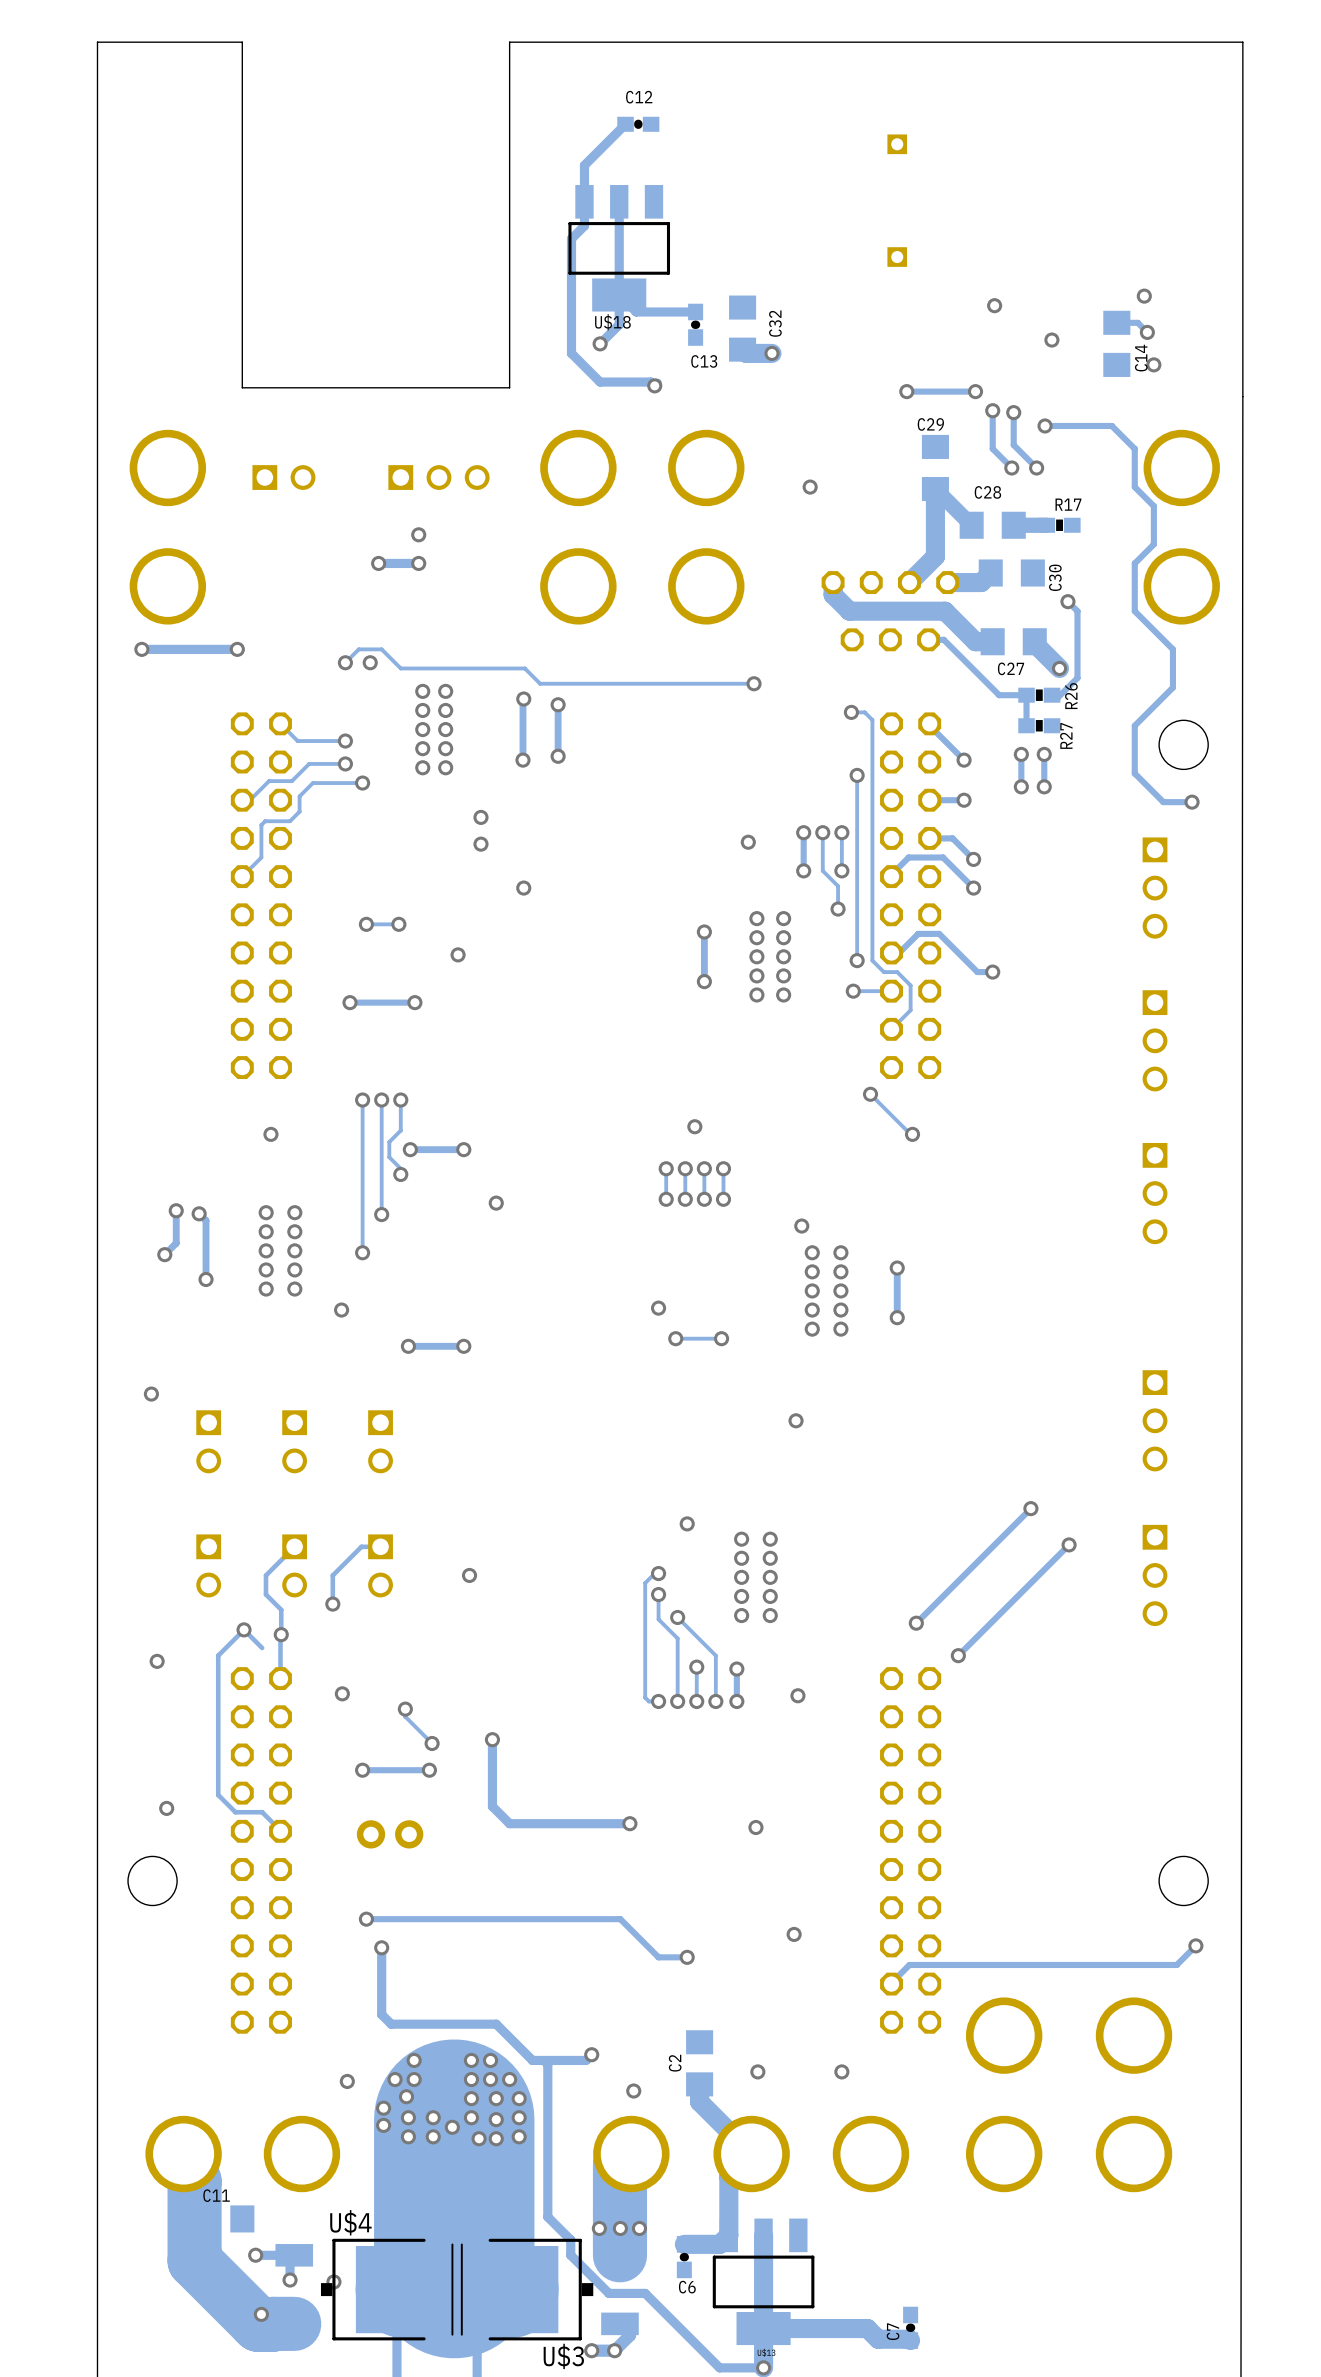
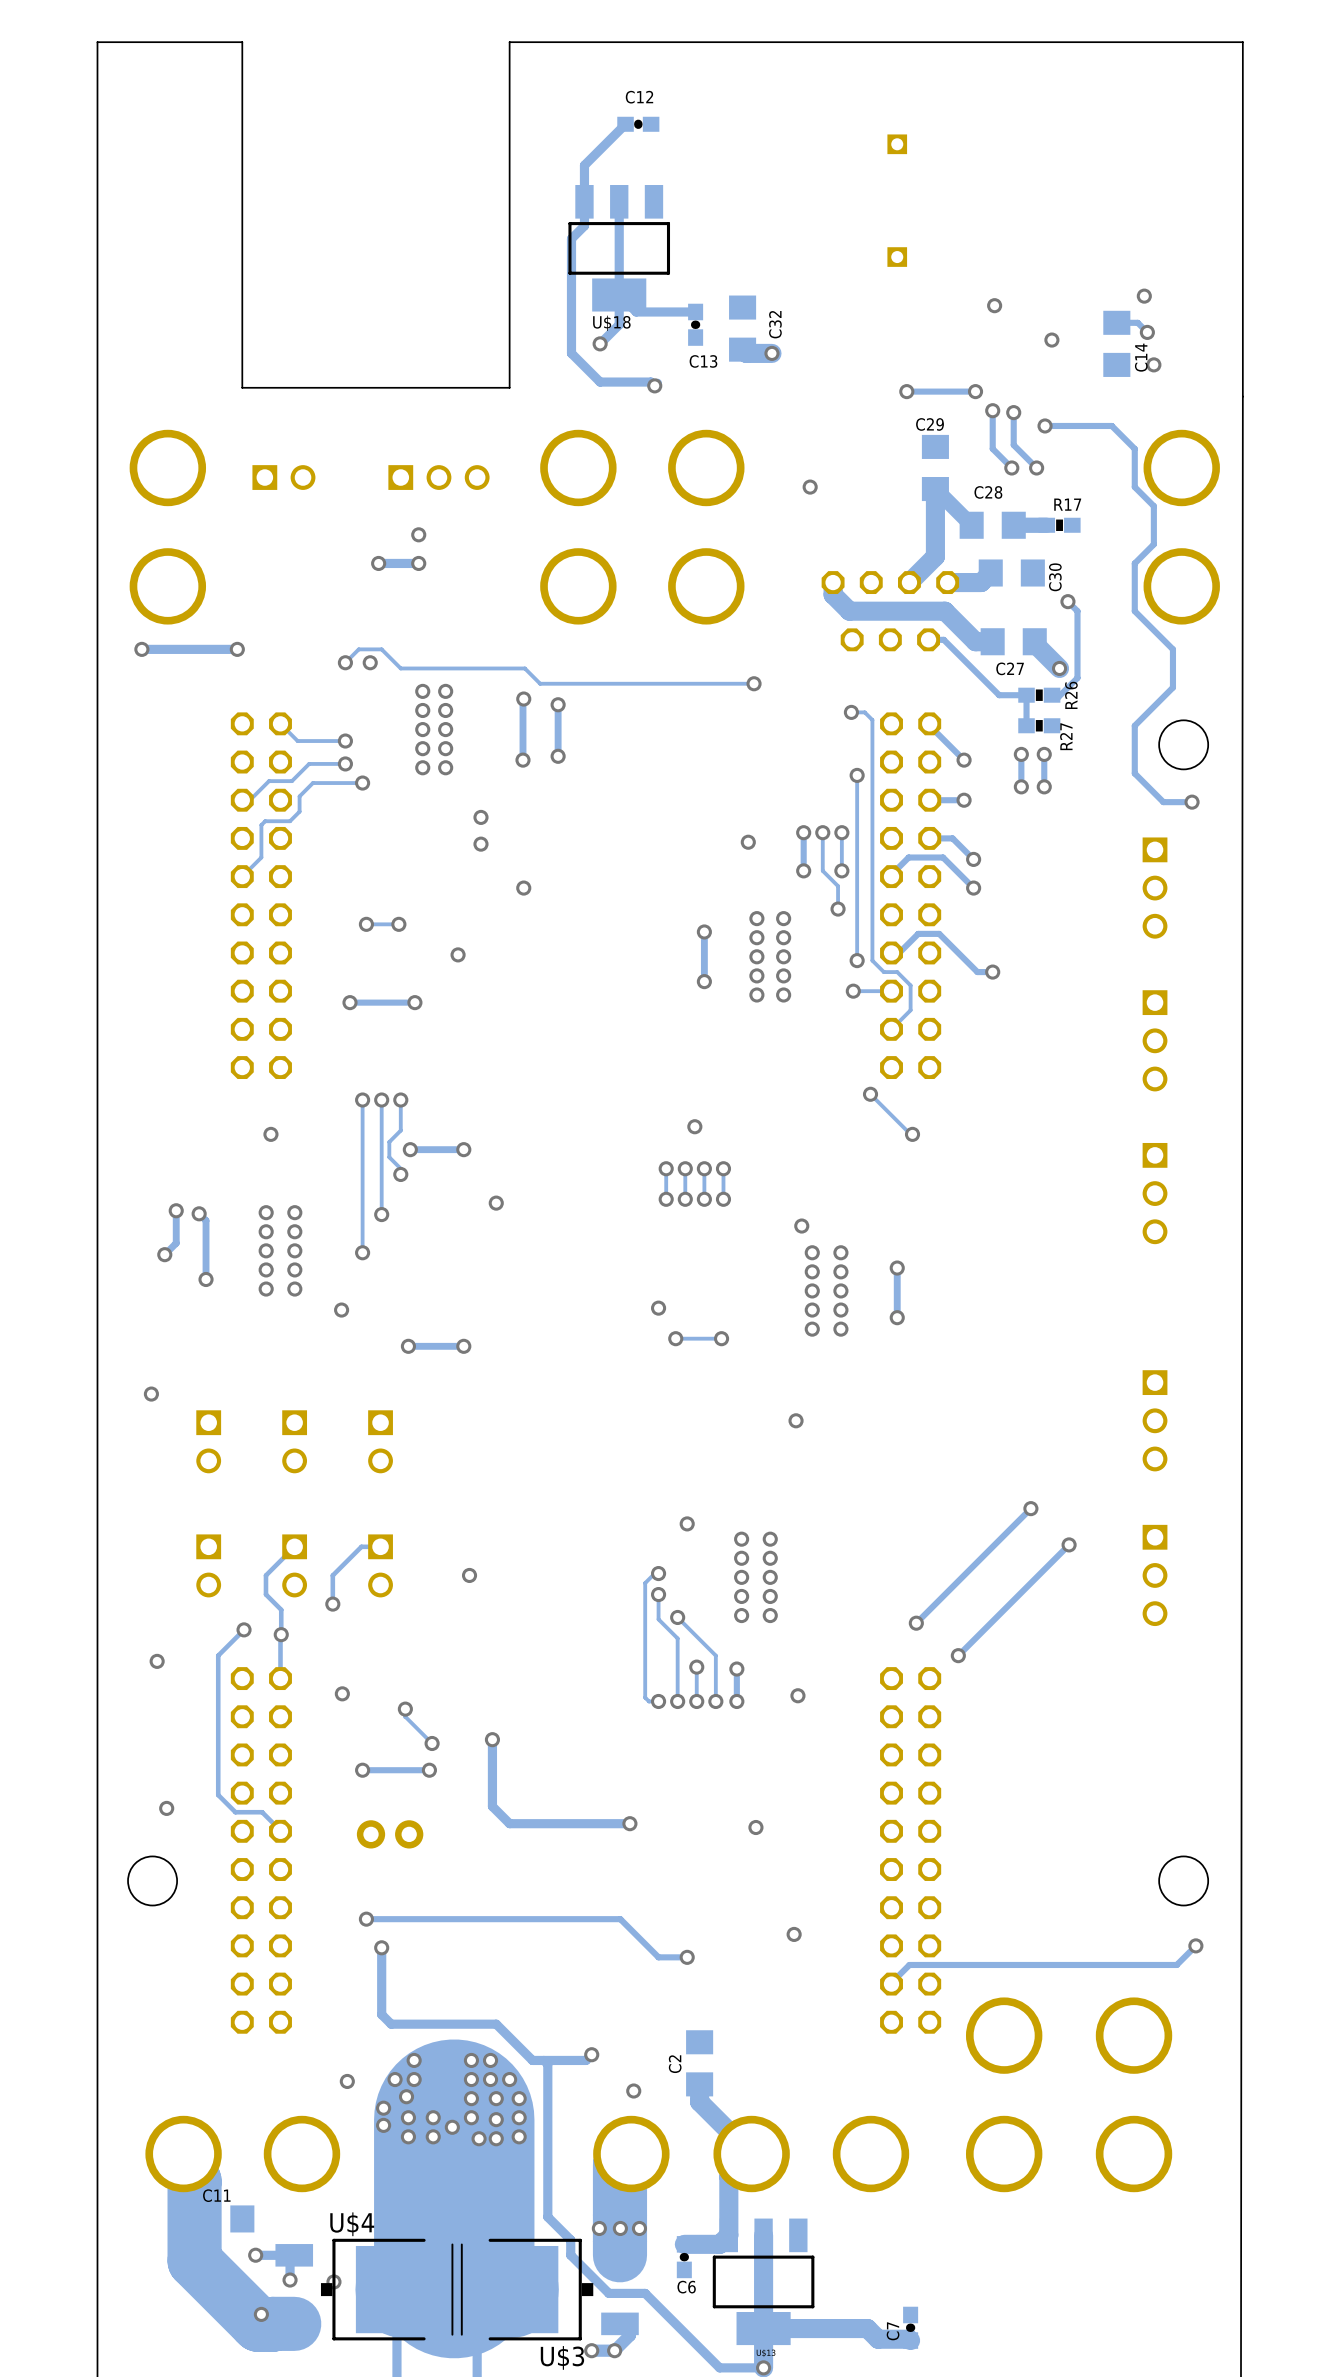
track: (244, 1629) (262, 1648) -> none
via: (757, 2071) -> none
via: (841, 2071) -> none

